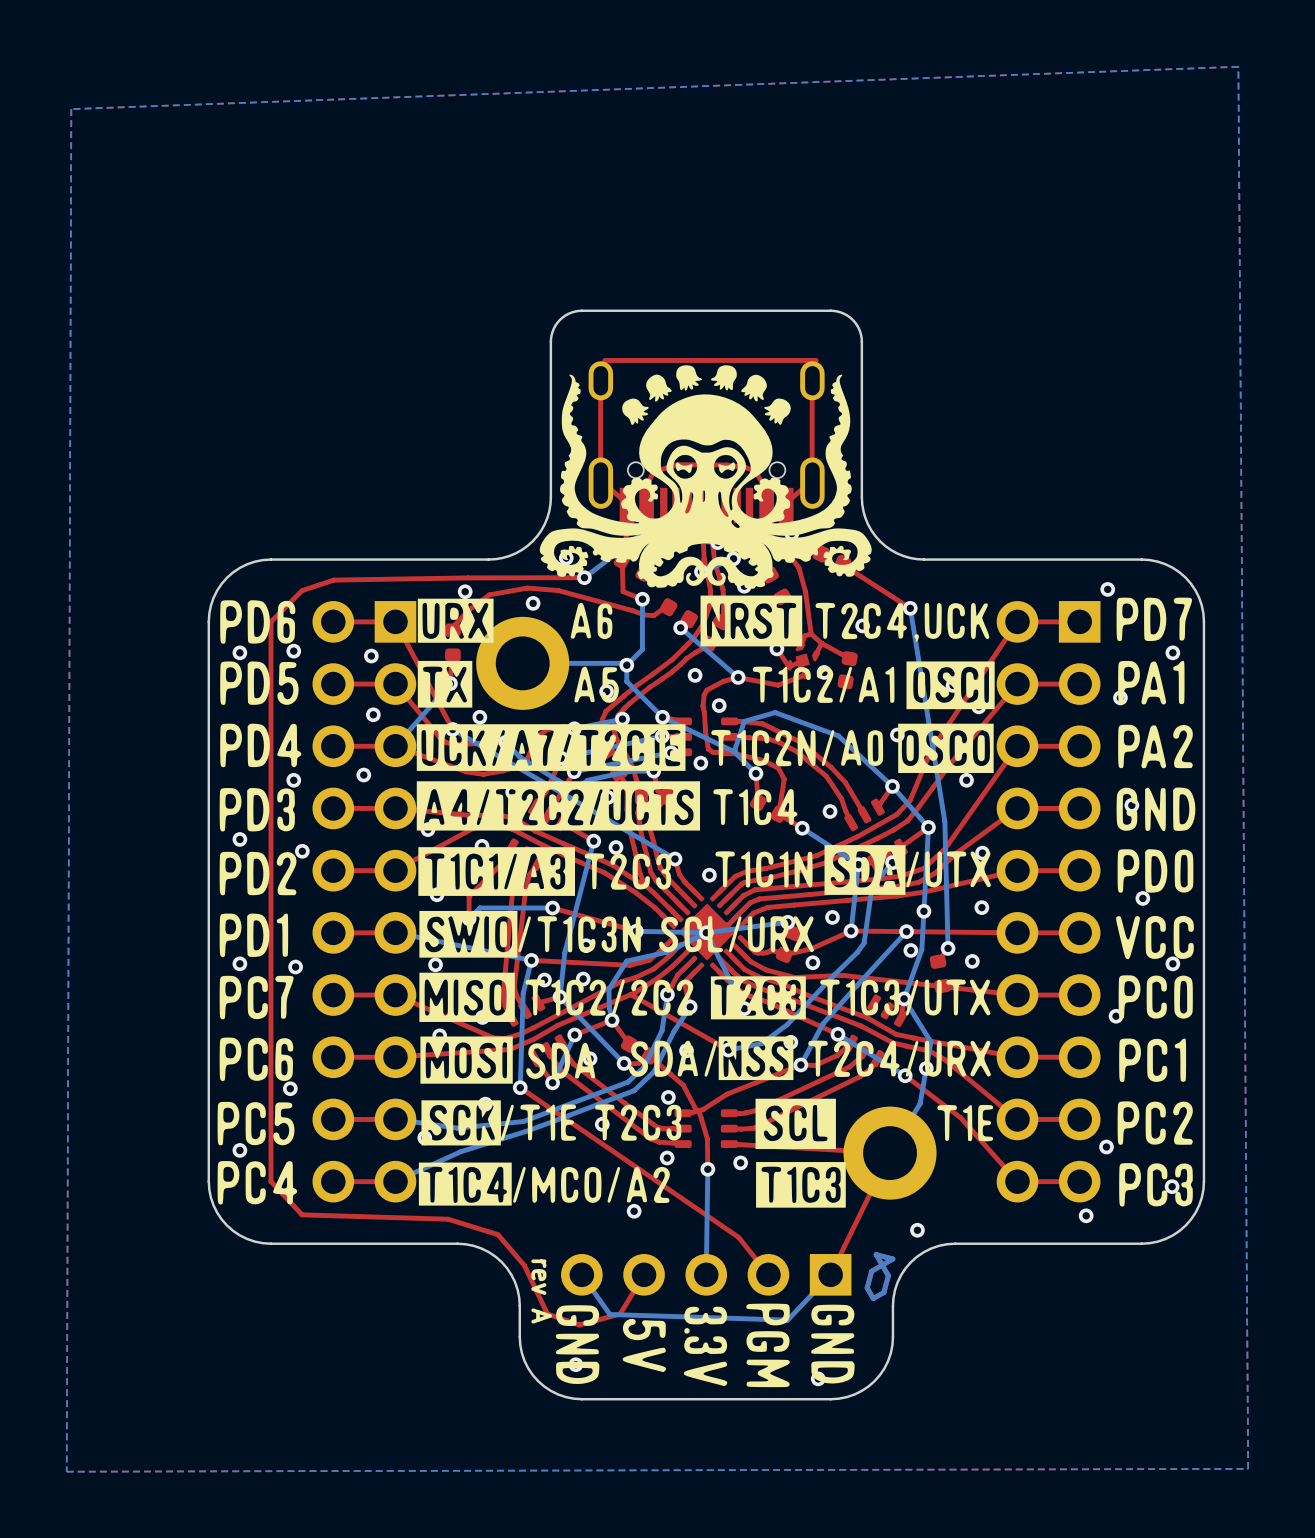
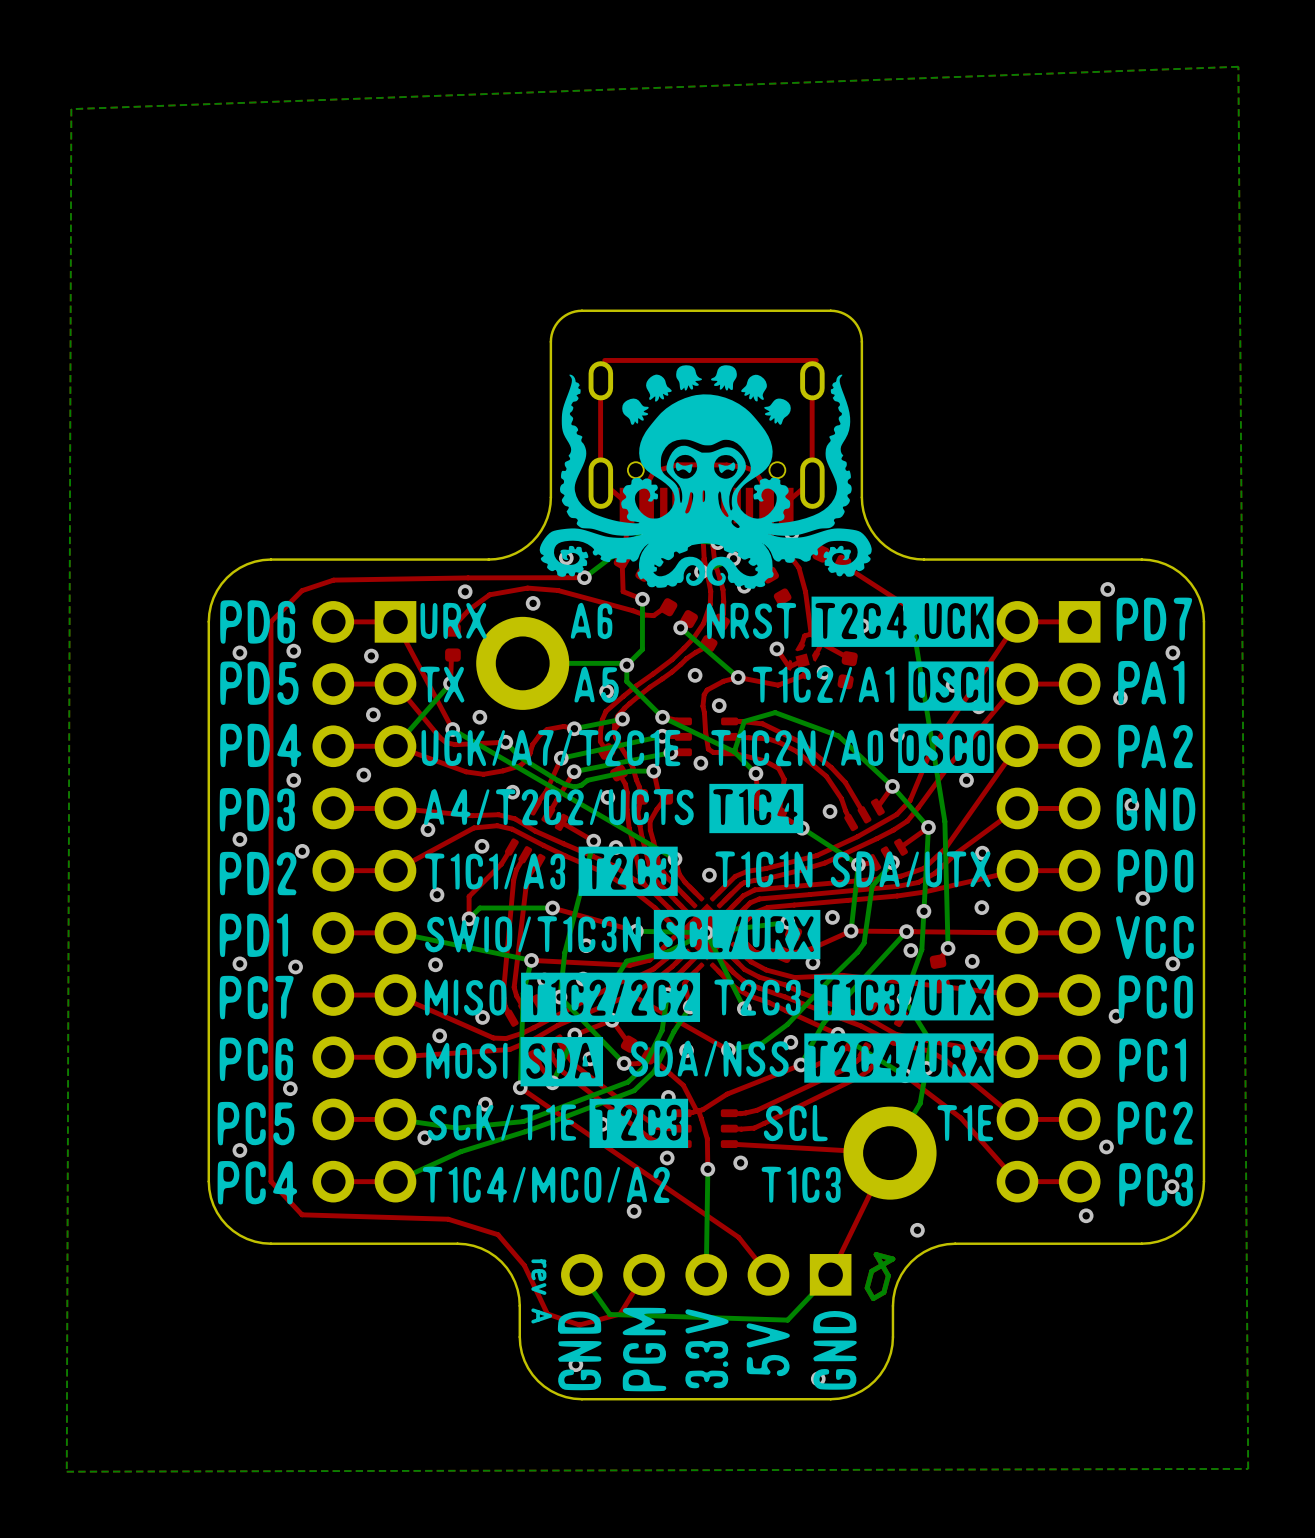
drawing shape: [217, 365, 1196, 1388] -> [217, 365, 1196, 1392]

